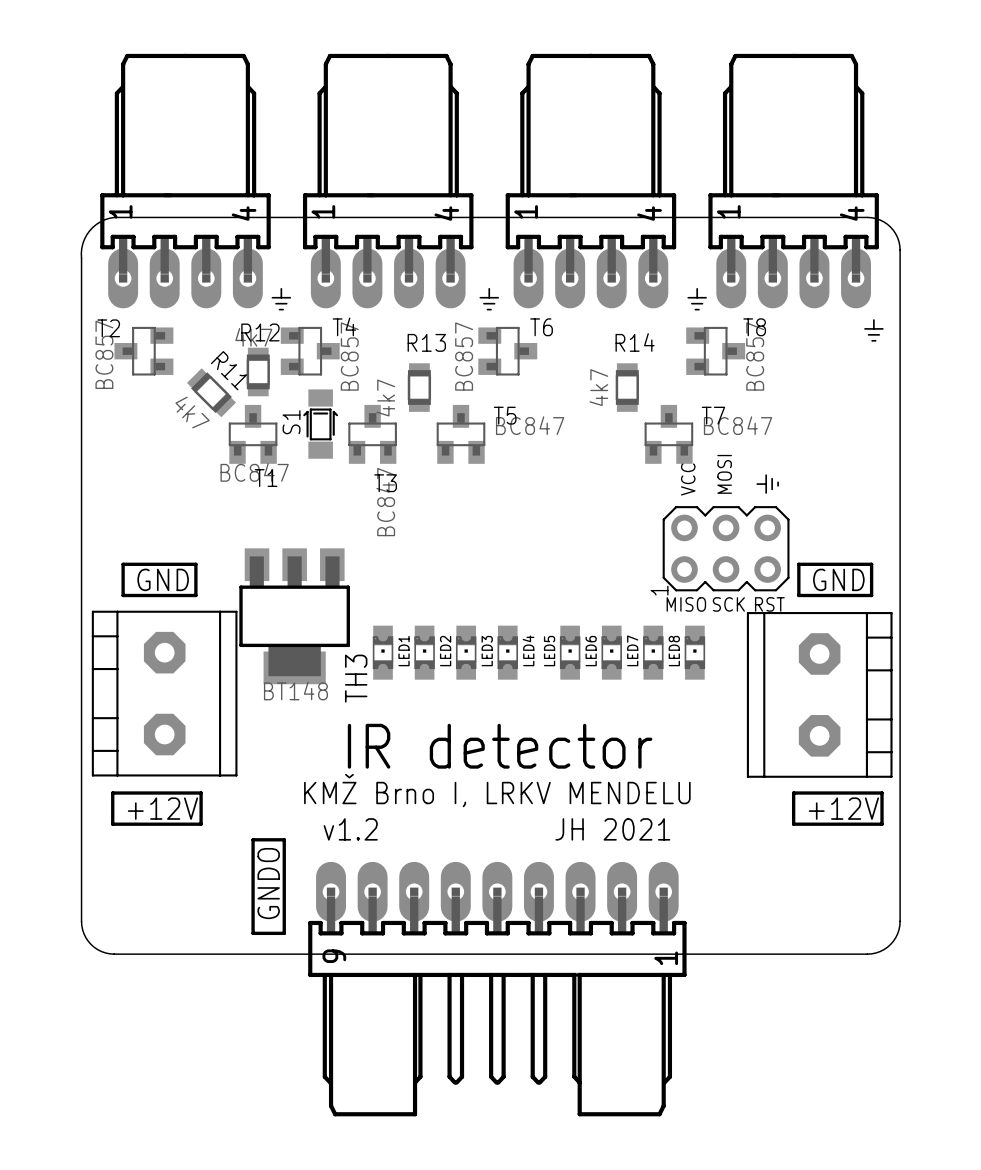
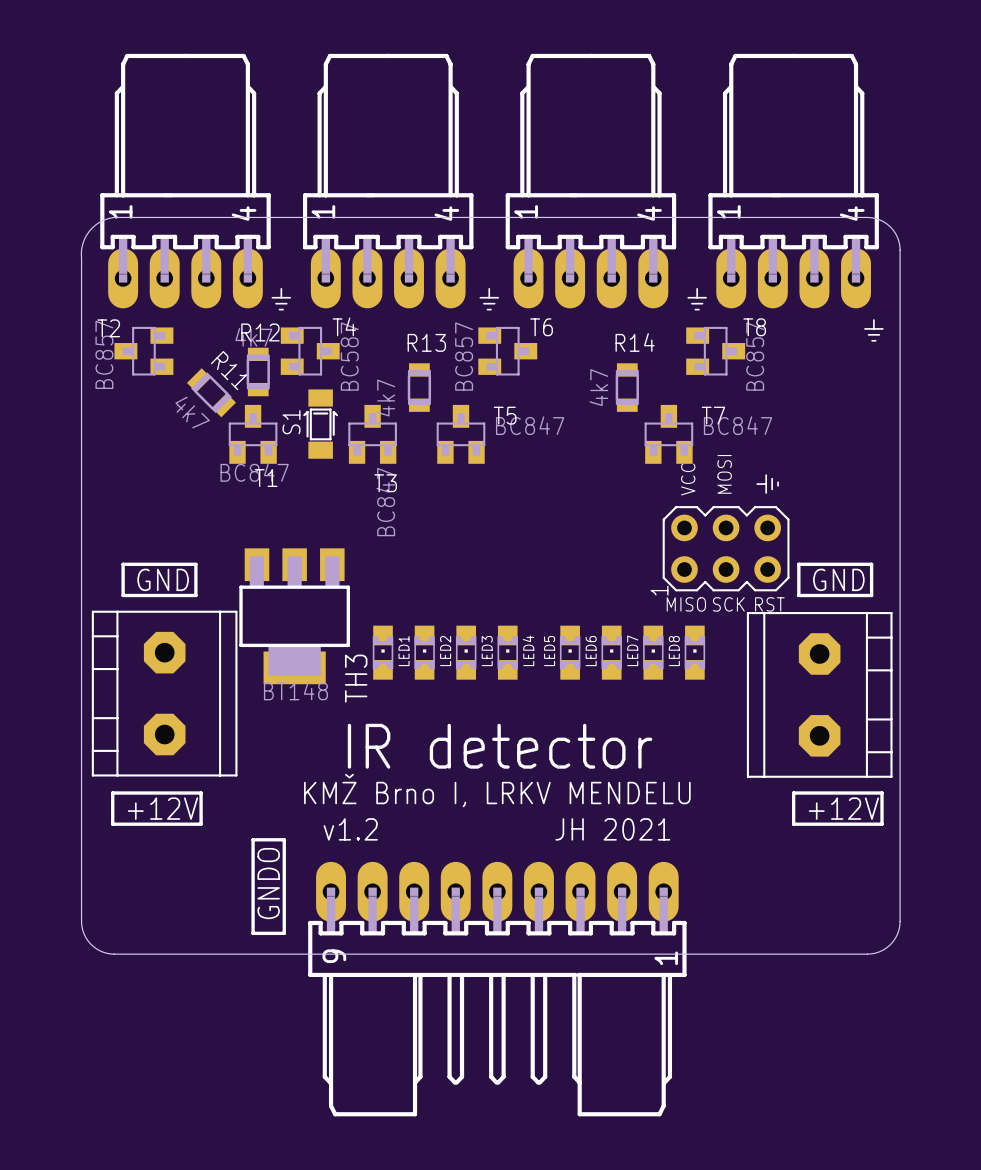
T4 value: BC857 (349, 356) -> BC587 (349, 356)

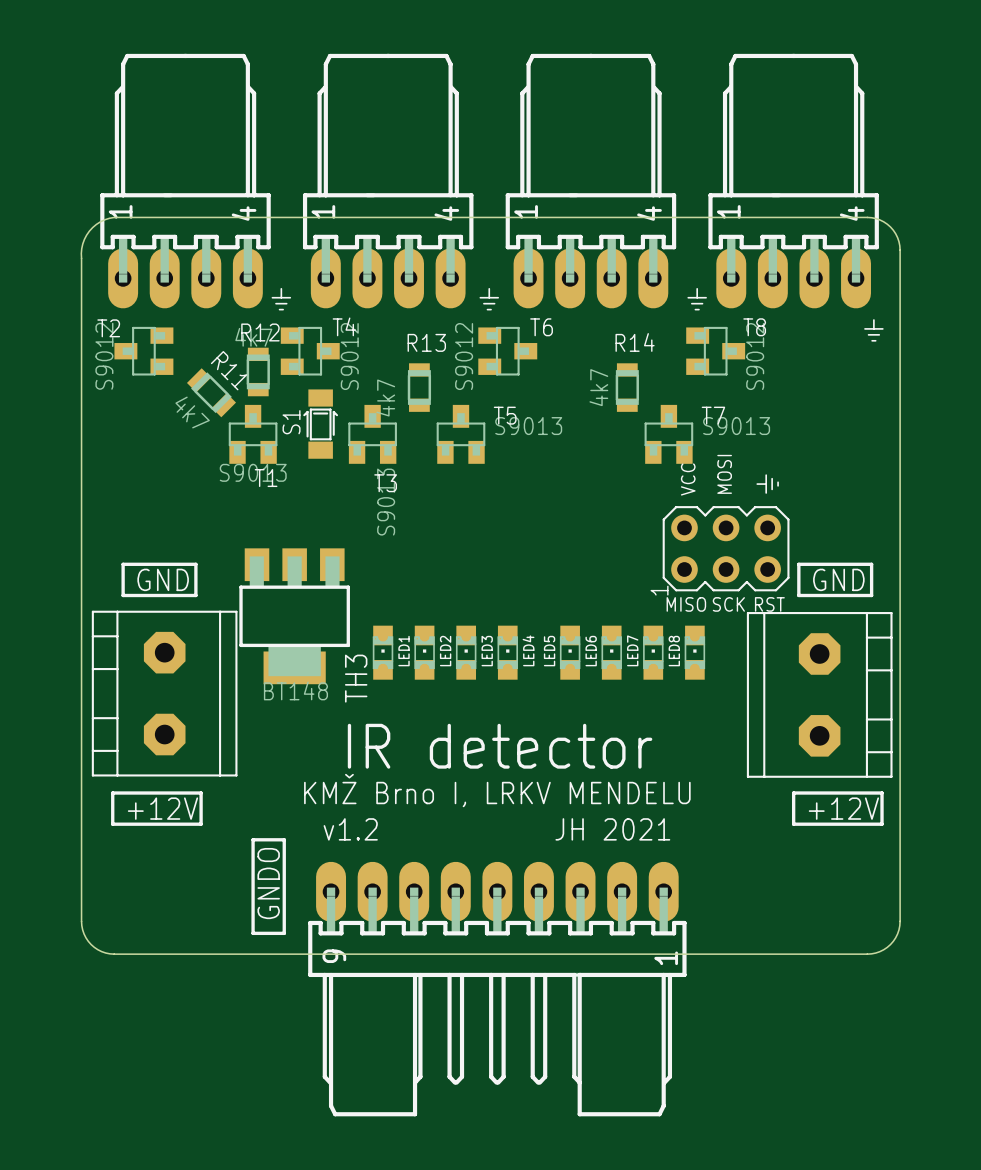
T2 value: BC857 (104, 354) -> S9012 (104, 356)
T4 value: BC587 (349, 356) -> S9012 (349, 356)
T6 value: BC857 (464, 356) -> S9012 (464, 356)
T8 value: BC857 (755, 356) -> S9012 (755, 356)
T5 value: BC847 (530, 425) -> S9013 (528, 426)
T7 value: BC847 (738, 425) -> S9013 (736, 426)
T1 value: BC847 (254, 472) -> S9013 (253, 472)
T3 value: BC847 (385, 502) -> S9013 (386, 502)

